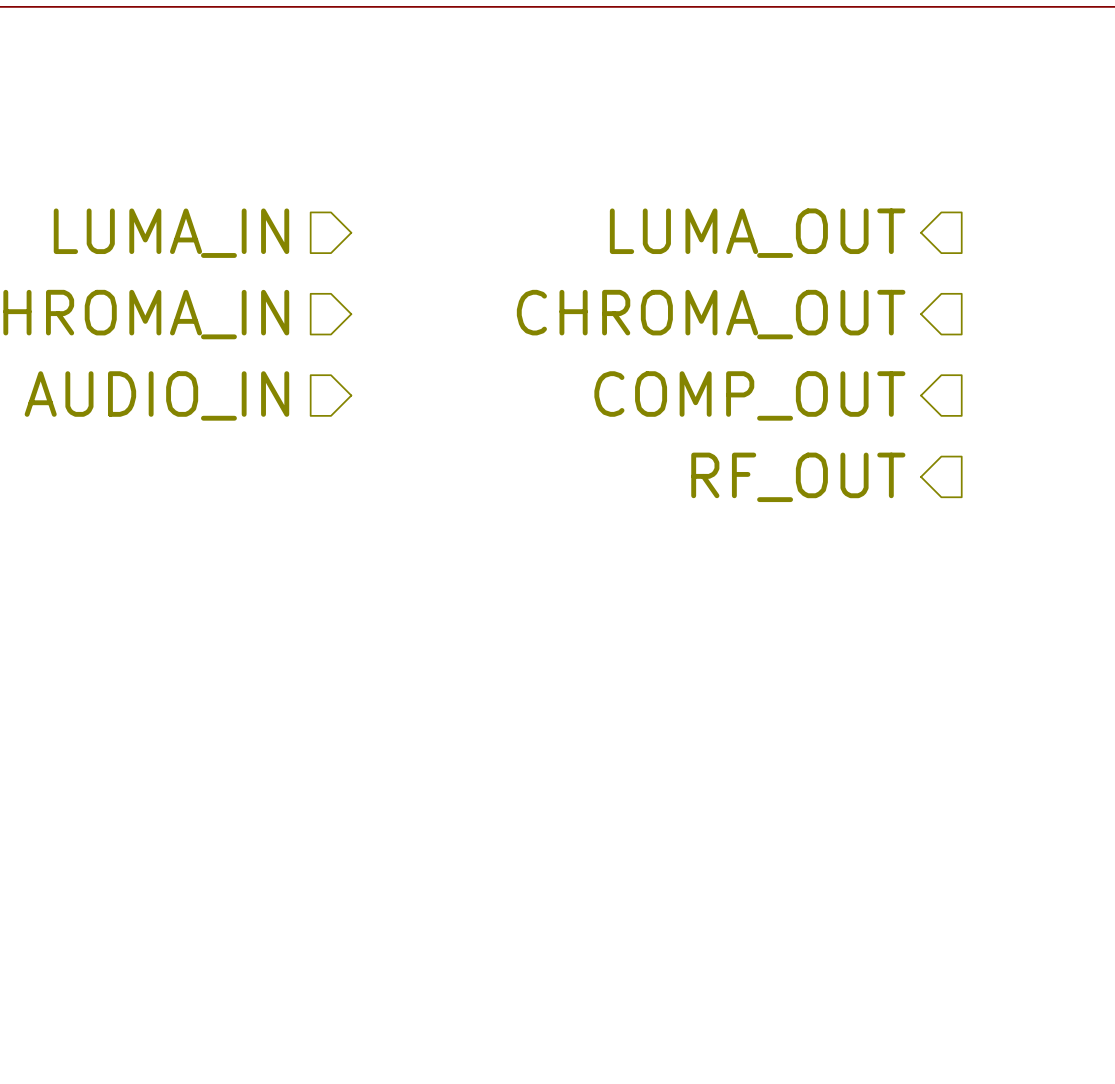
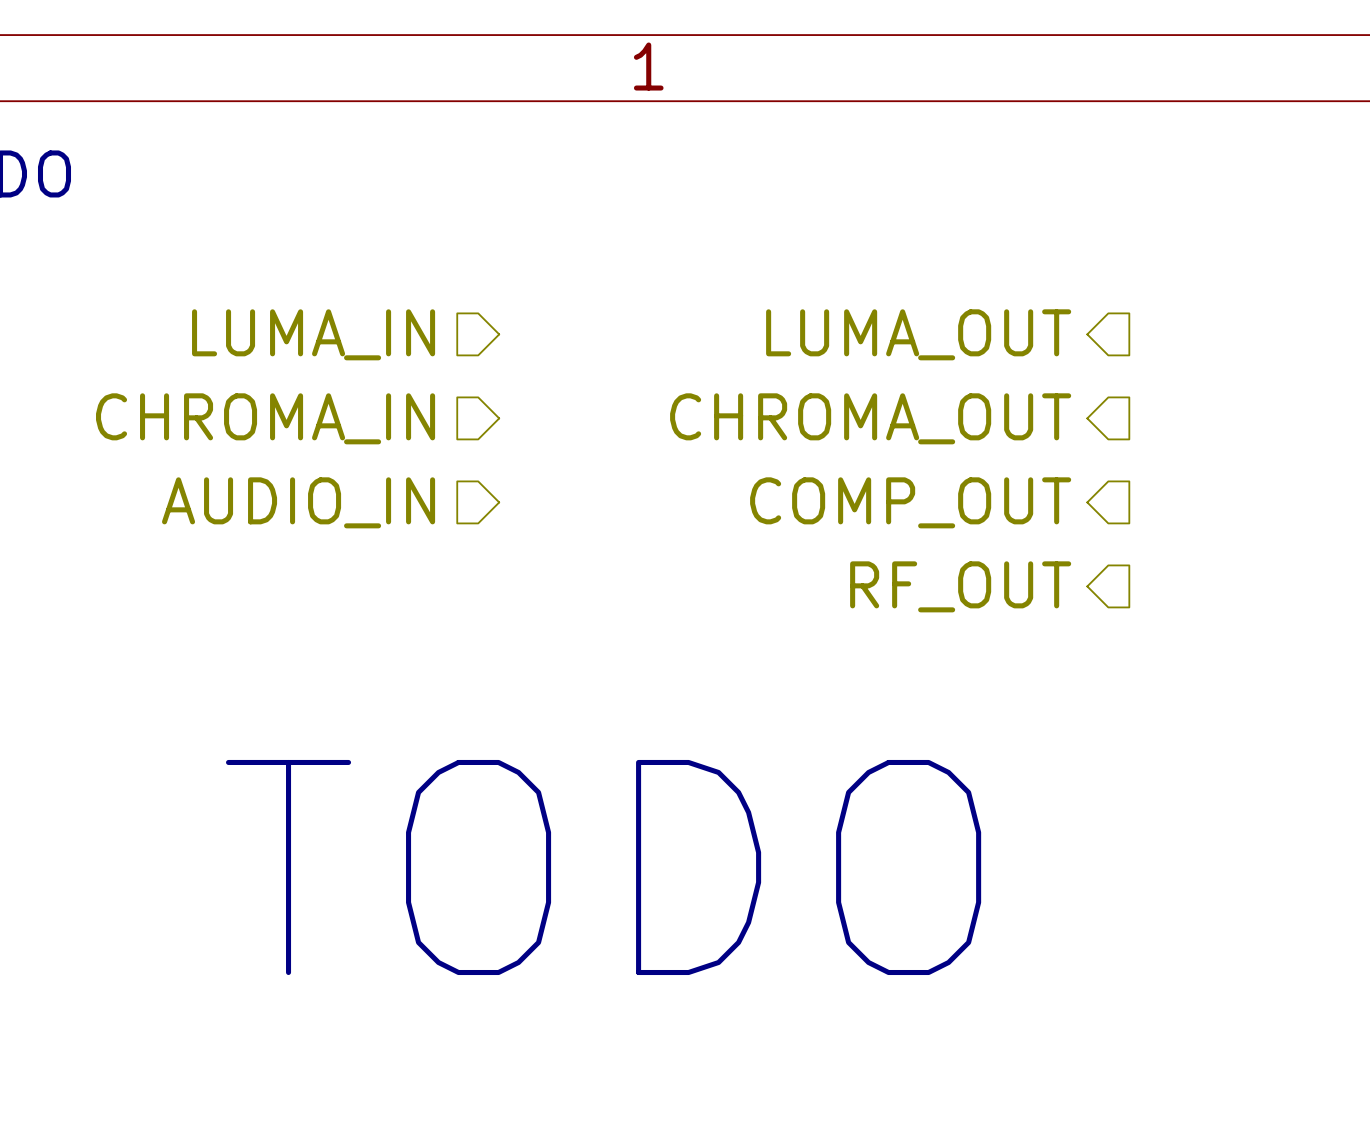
text: none -> TODO (603, 867)

